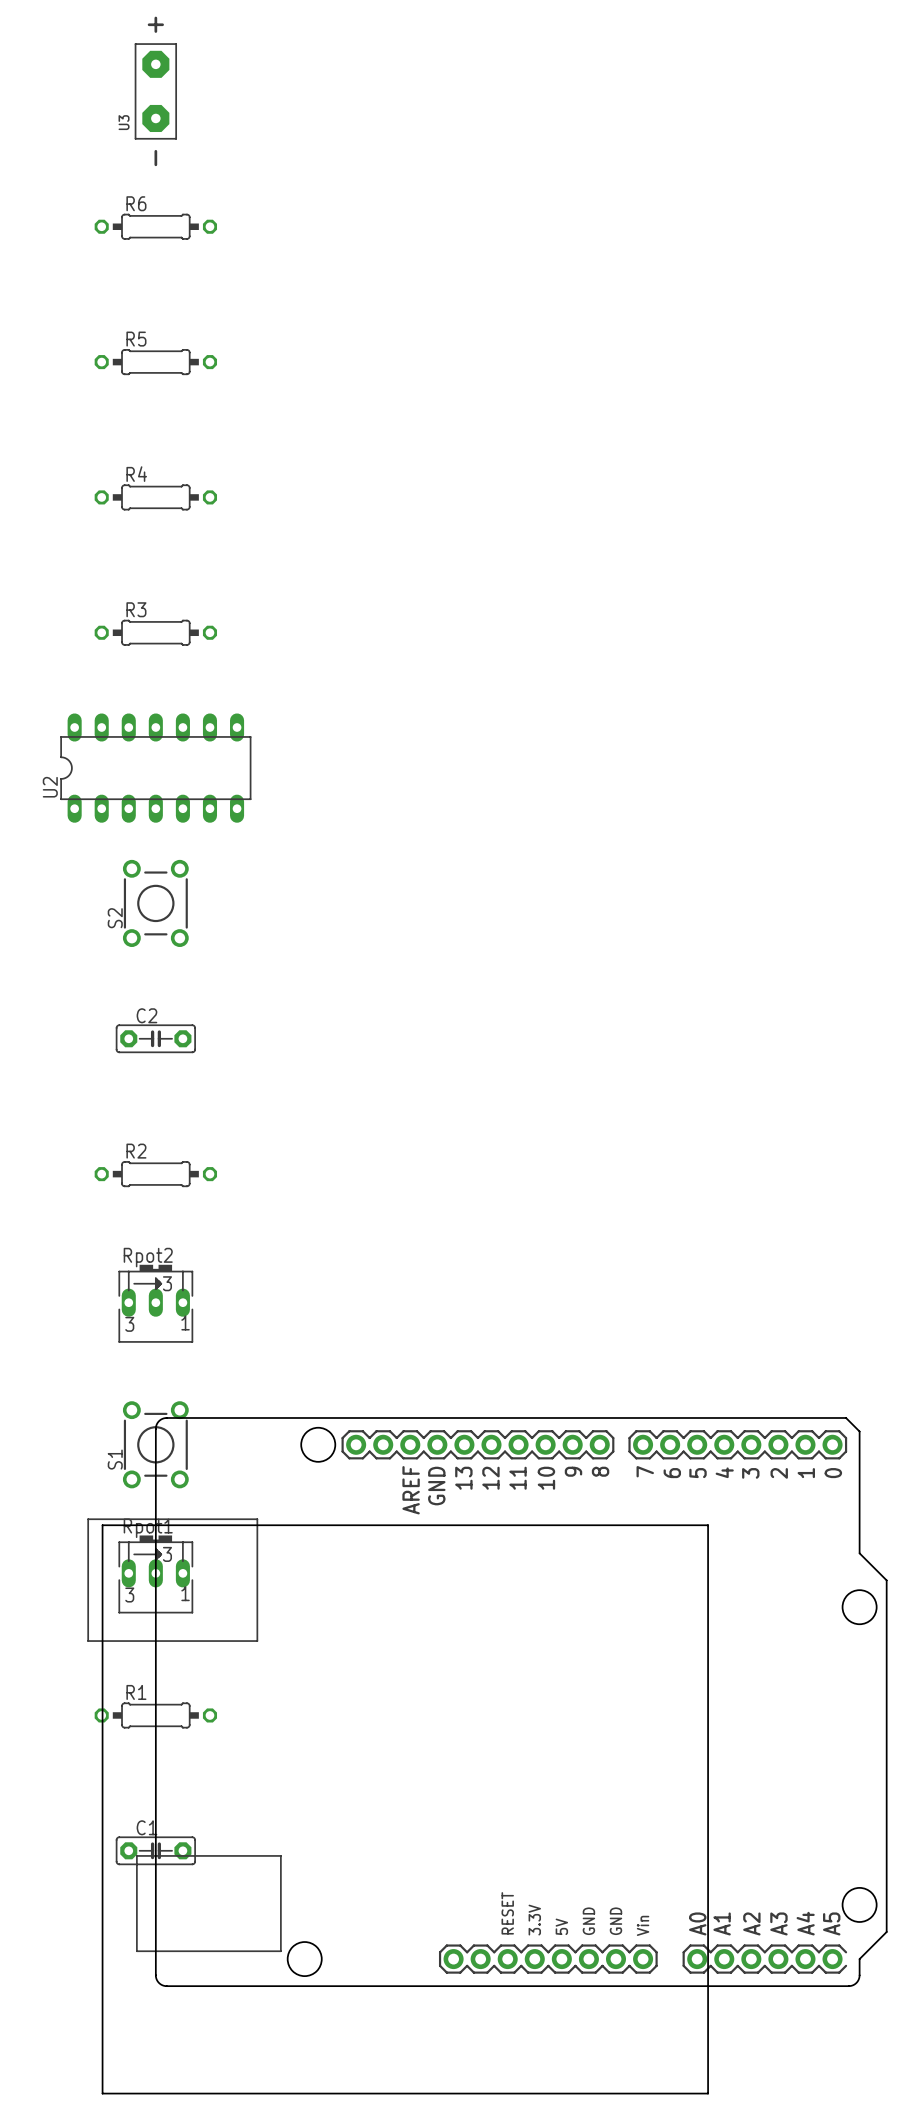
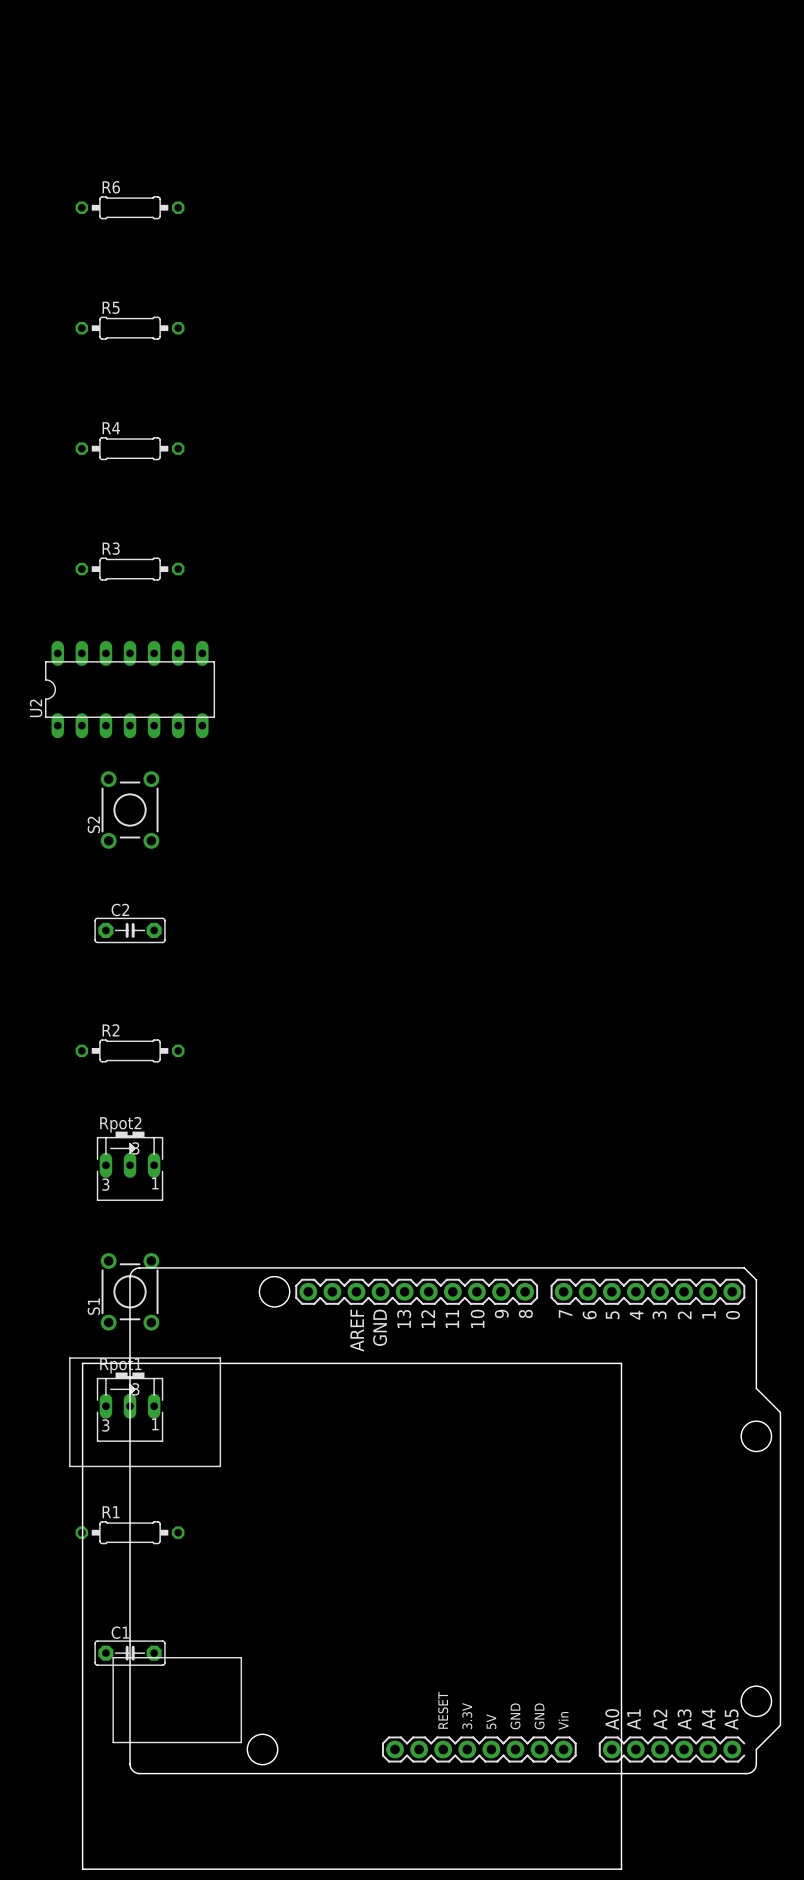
U3: (155, 91) -> none

